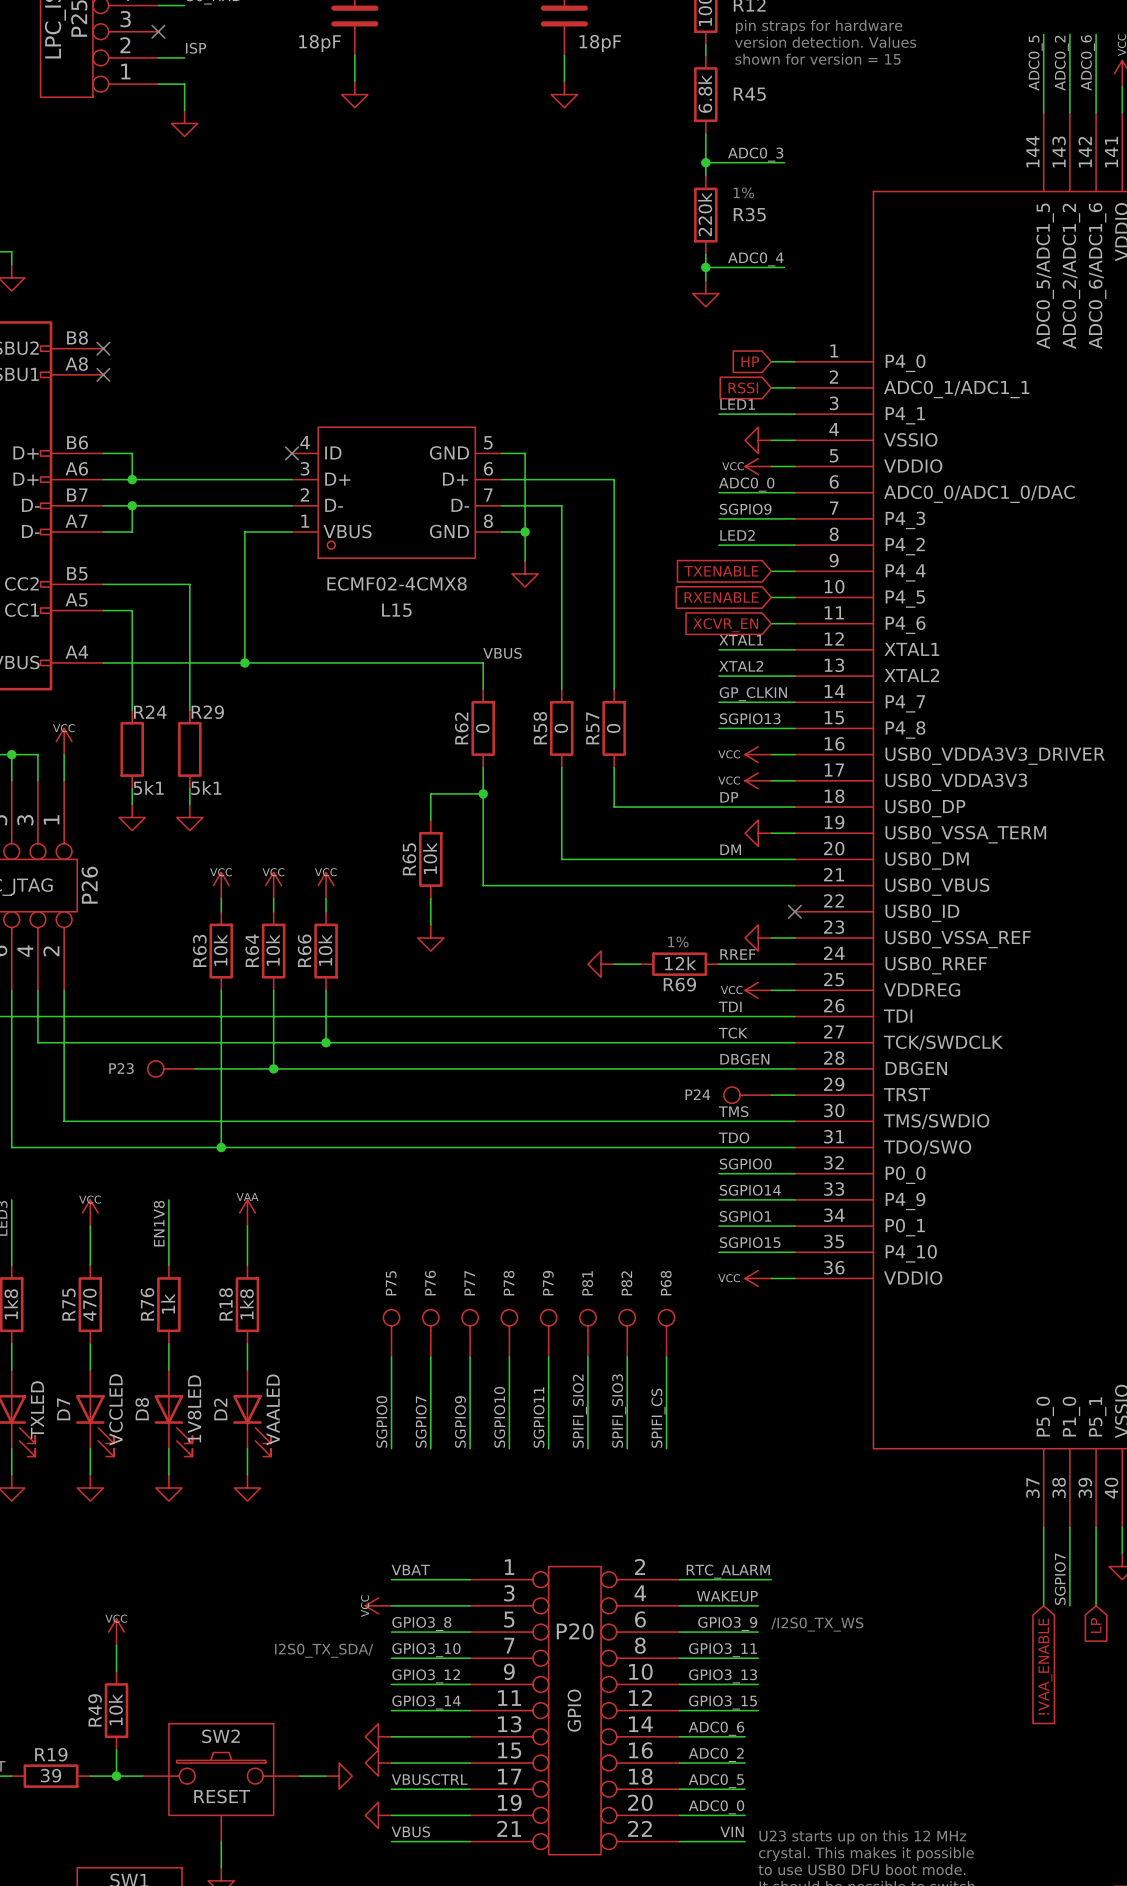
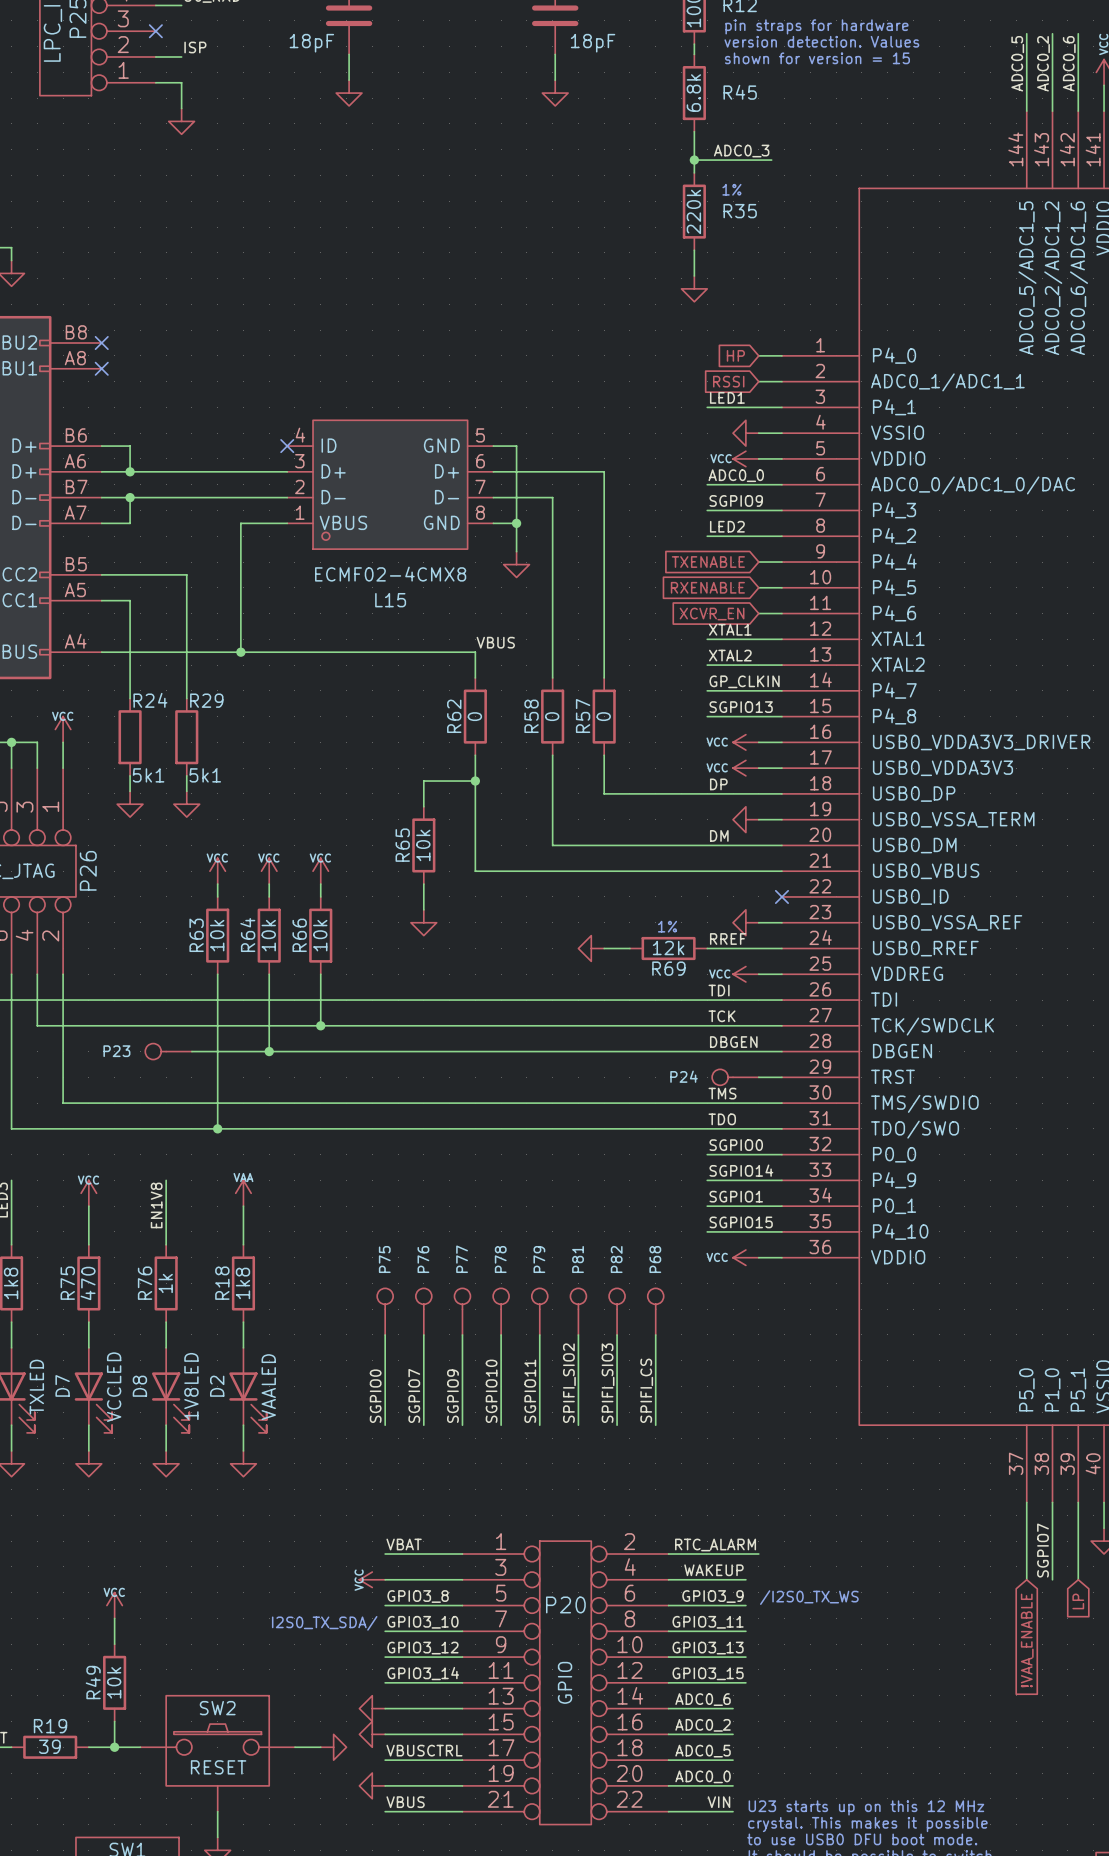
label: ADC0_4 (755, 259) -> none
wire: (705, 267) (784, 267) -> none
junction: (705, 267) -> none

